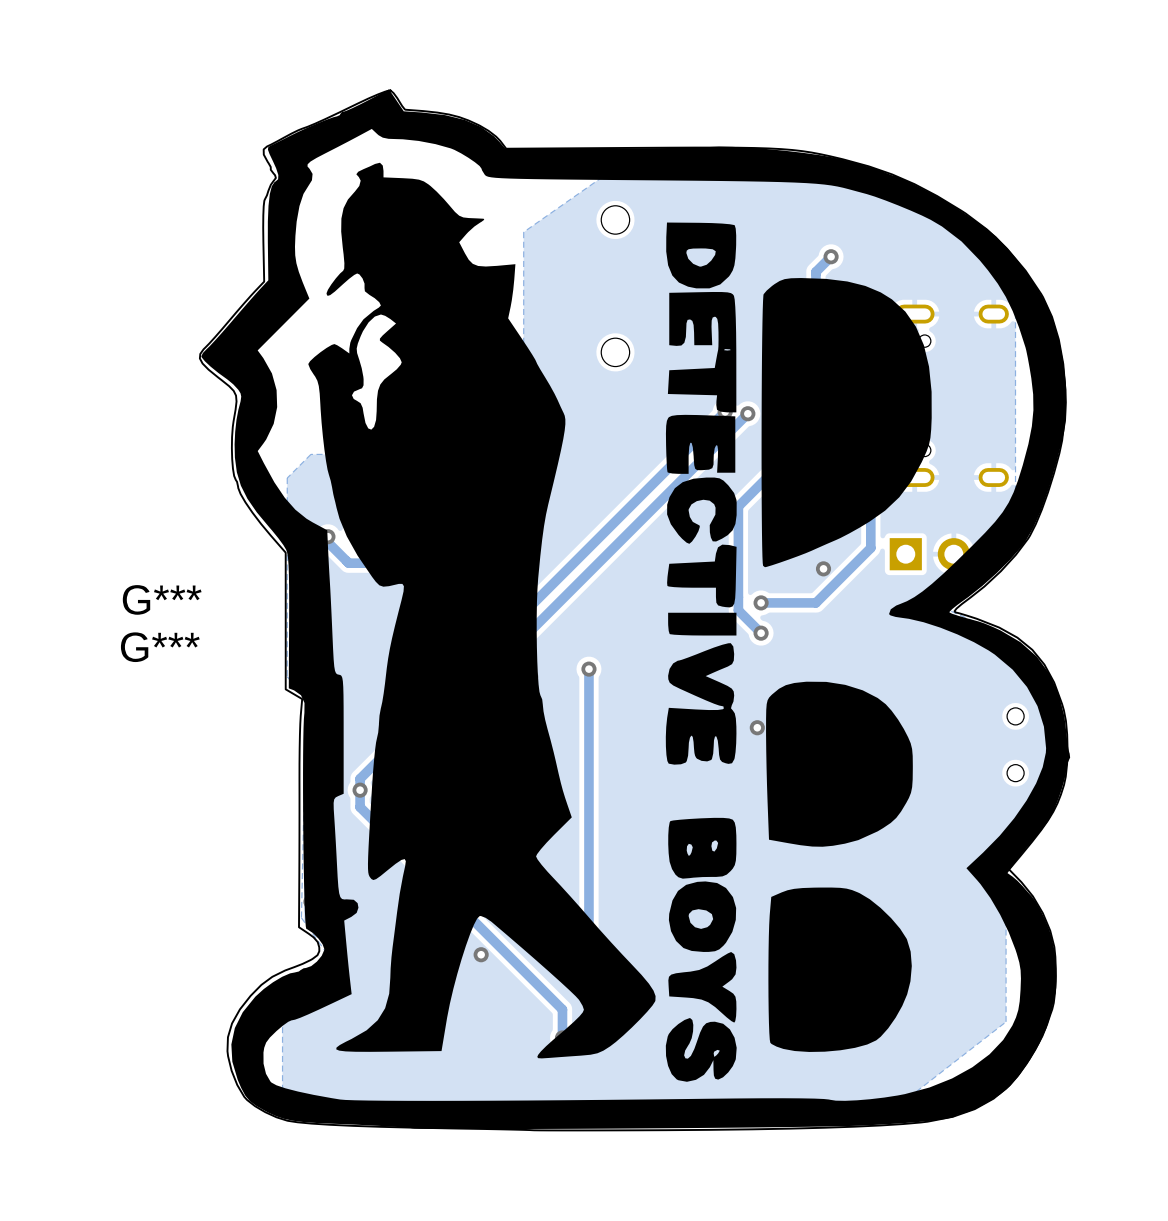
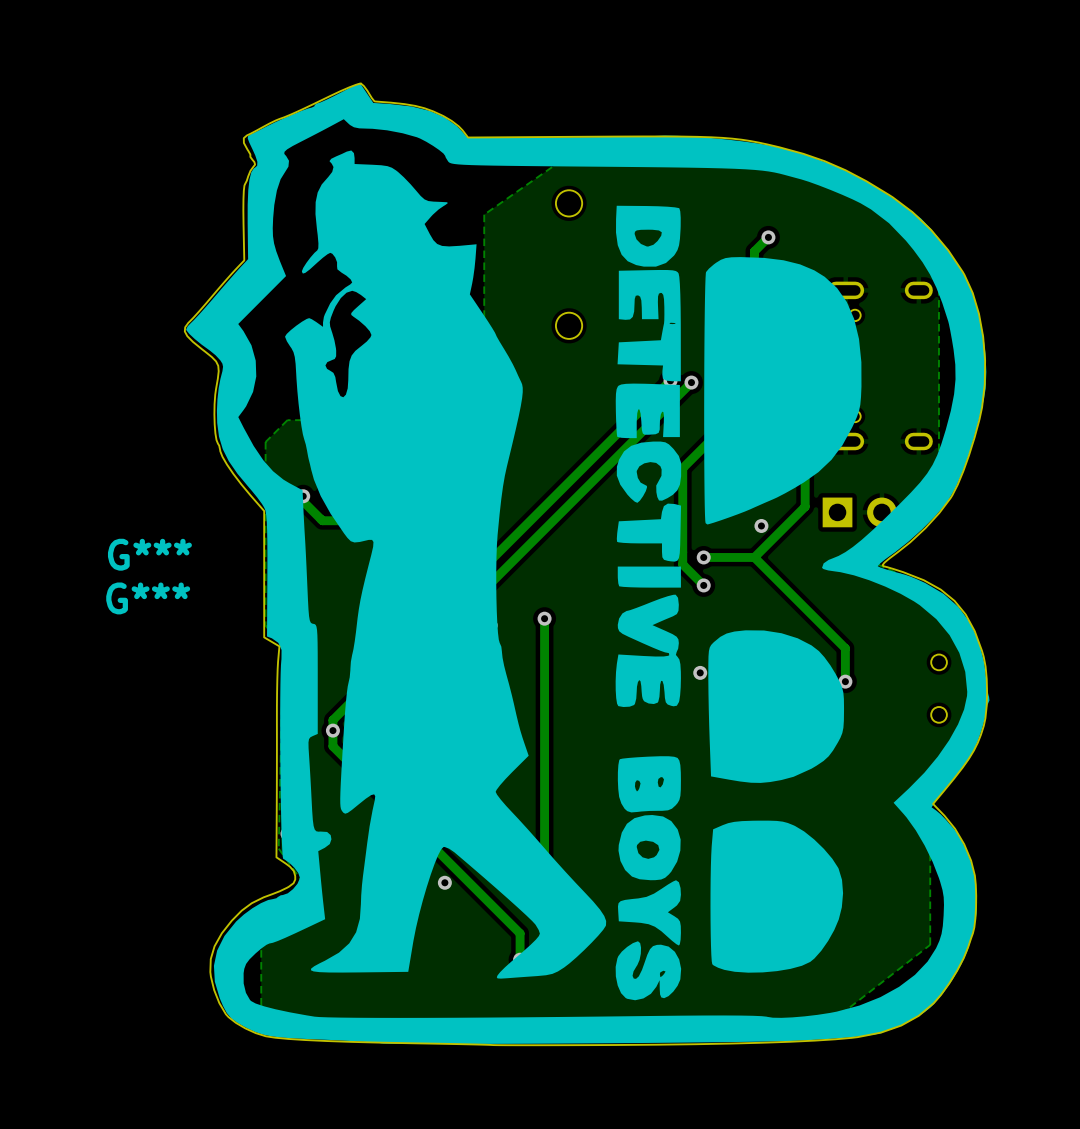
track: none -> (754, 557) (845, 648) (845, 681)
via: none -> (845, 681)

